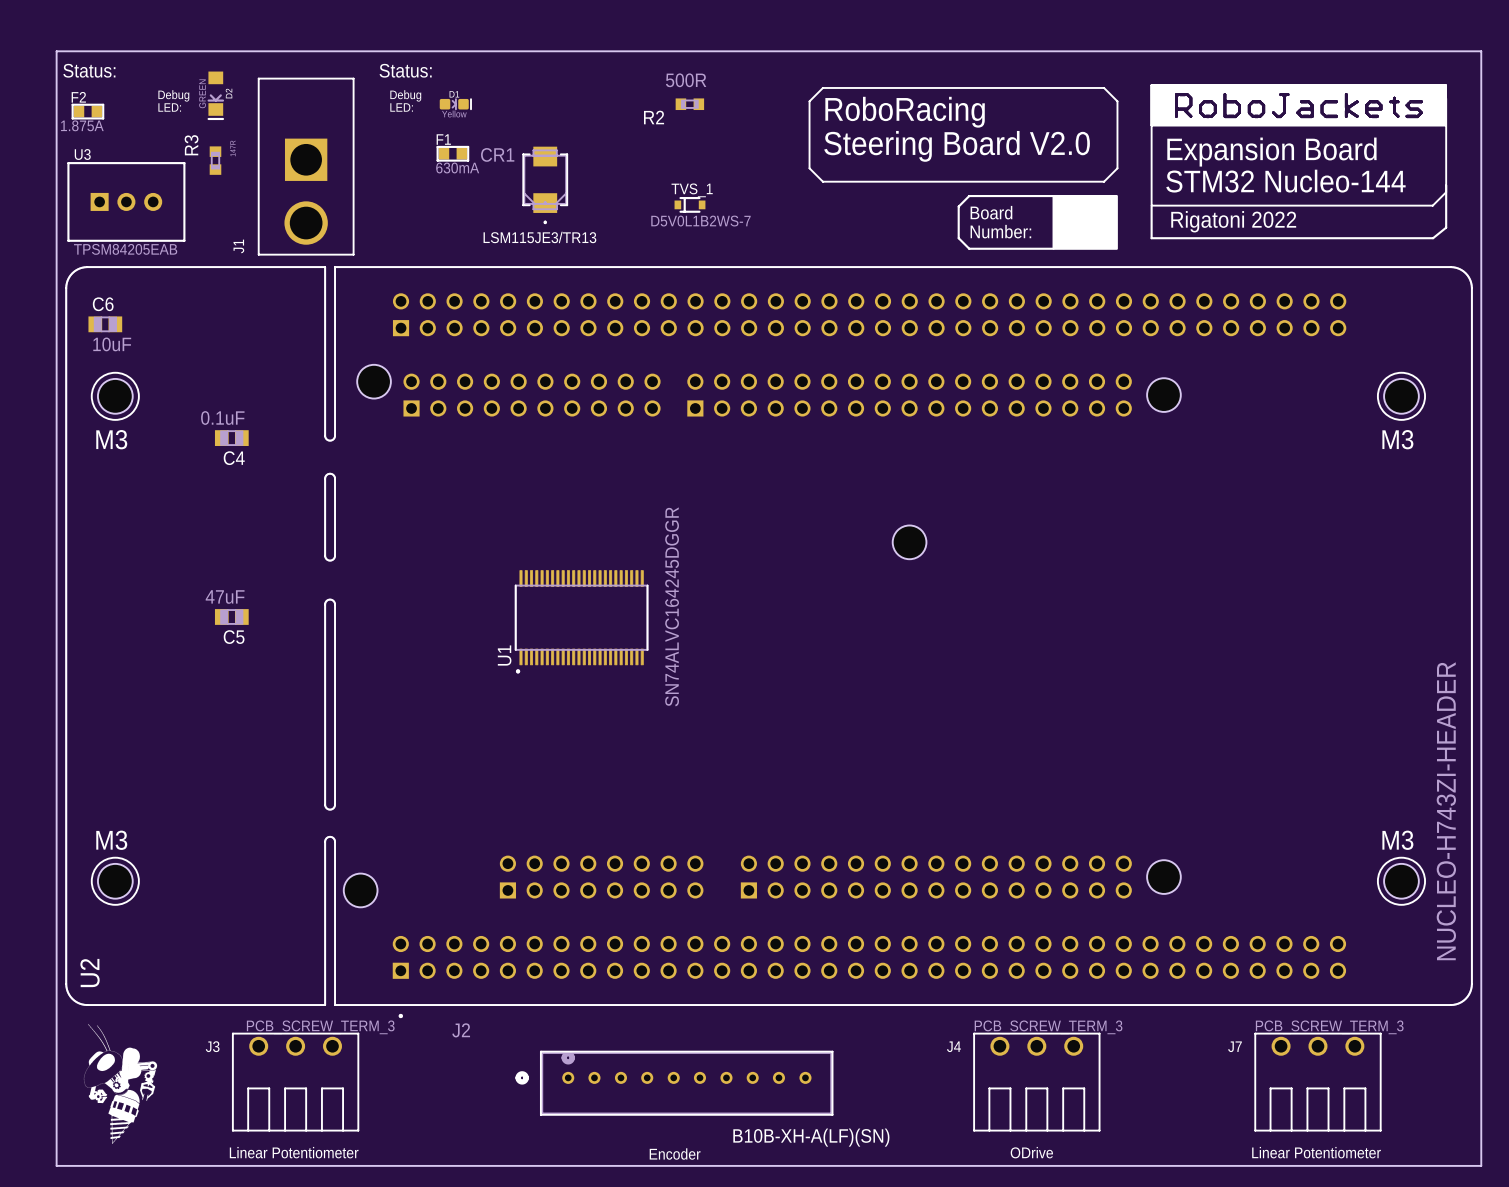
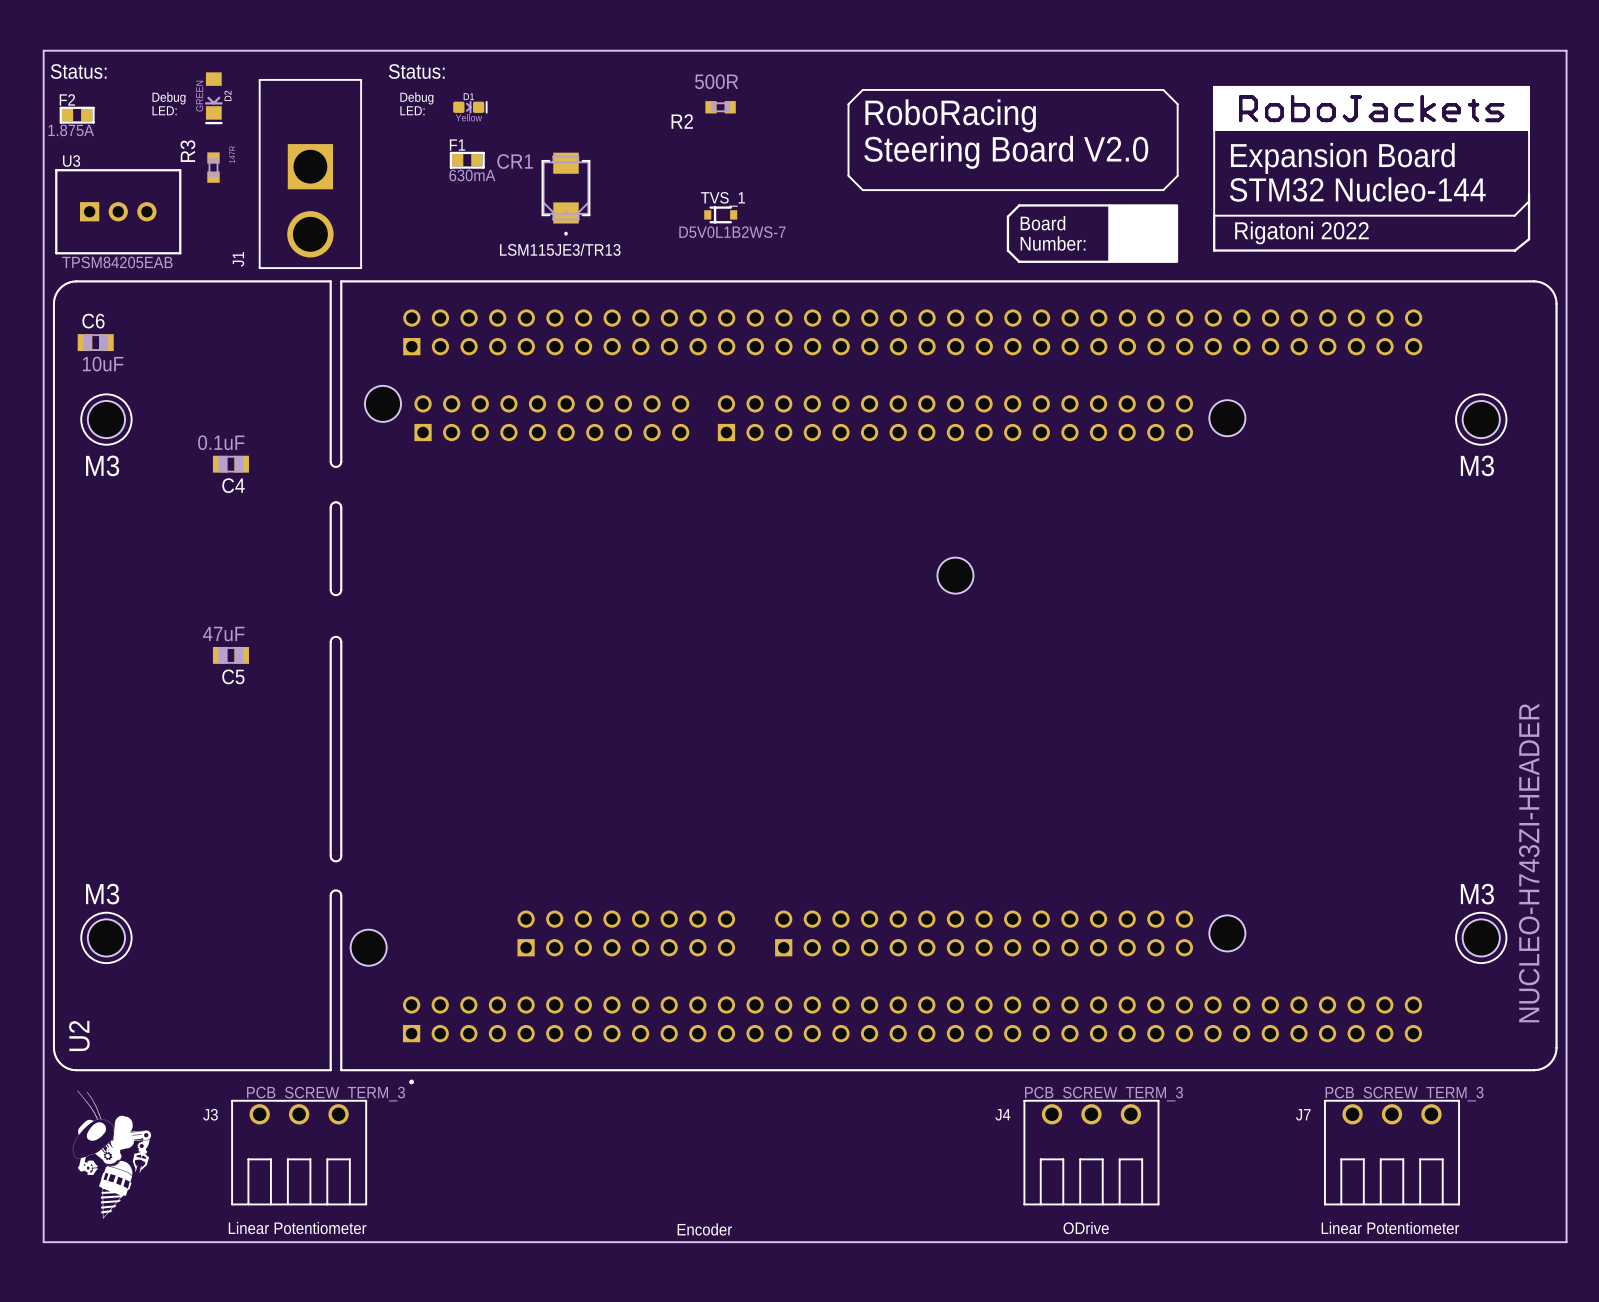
U1: SN74ALVC164245DGGR (581, 621) -> none
J2: B10B-XH-A(LF)(SN) (674, 1083) -> none

